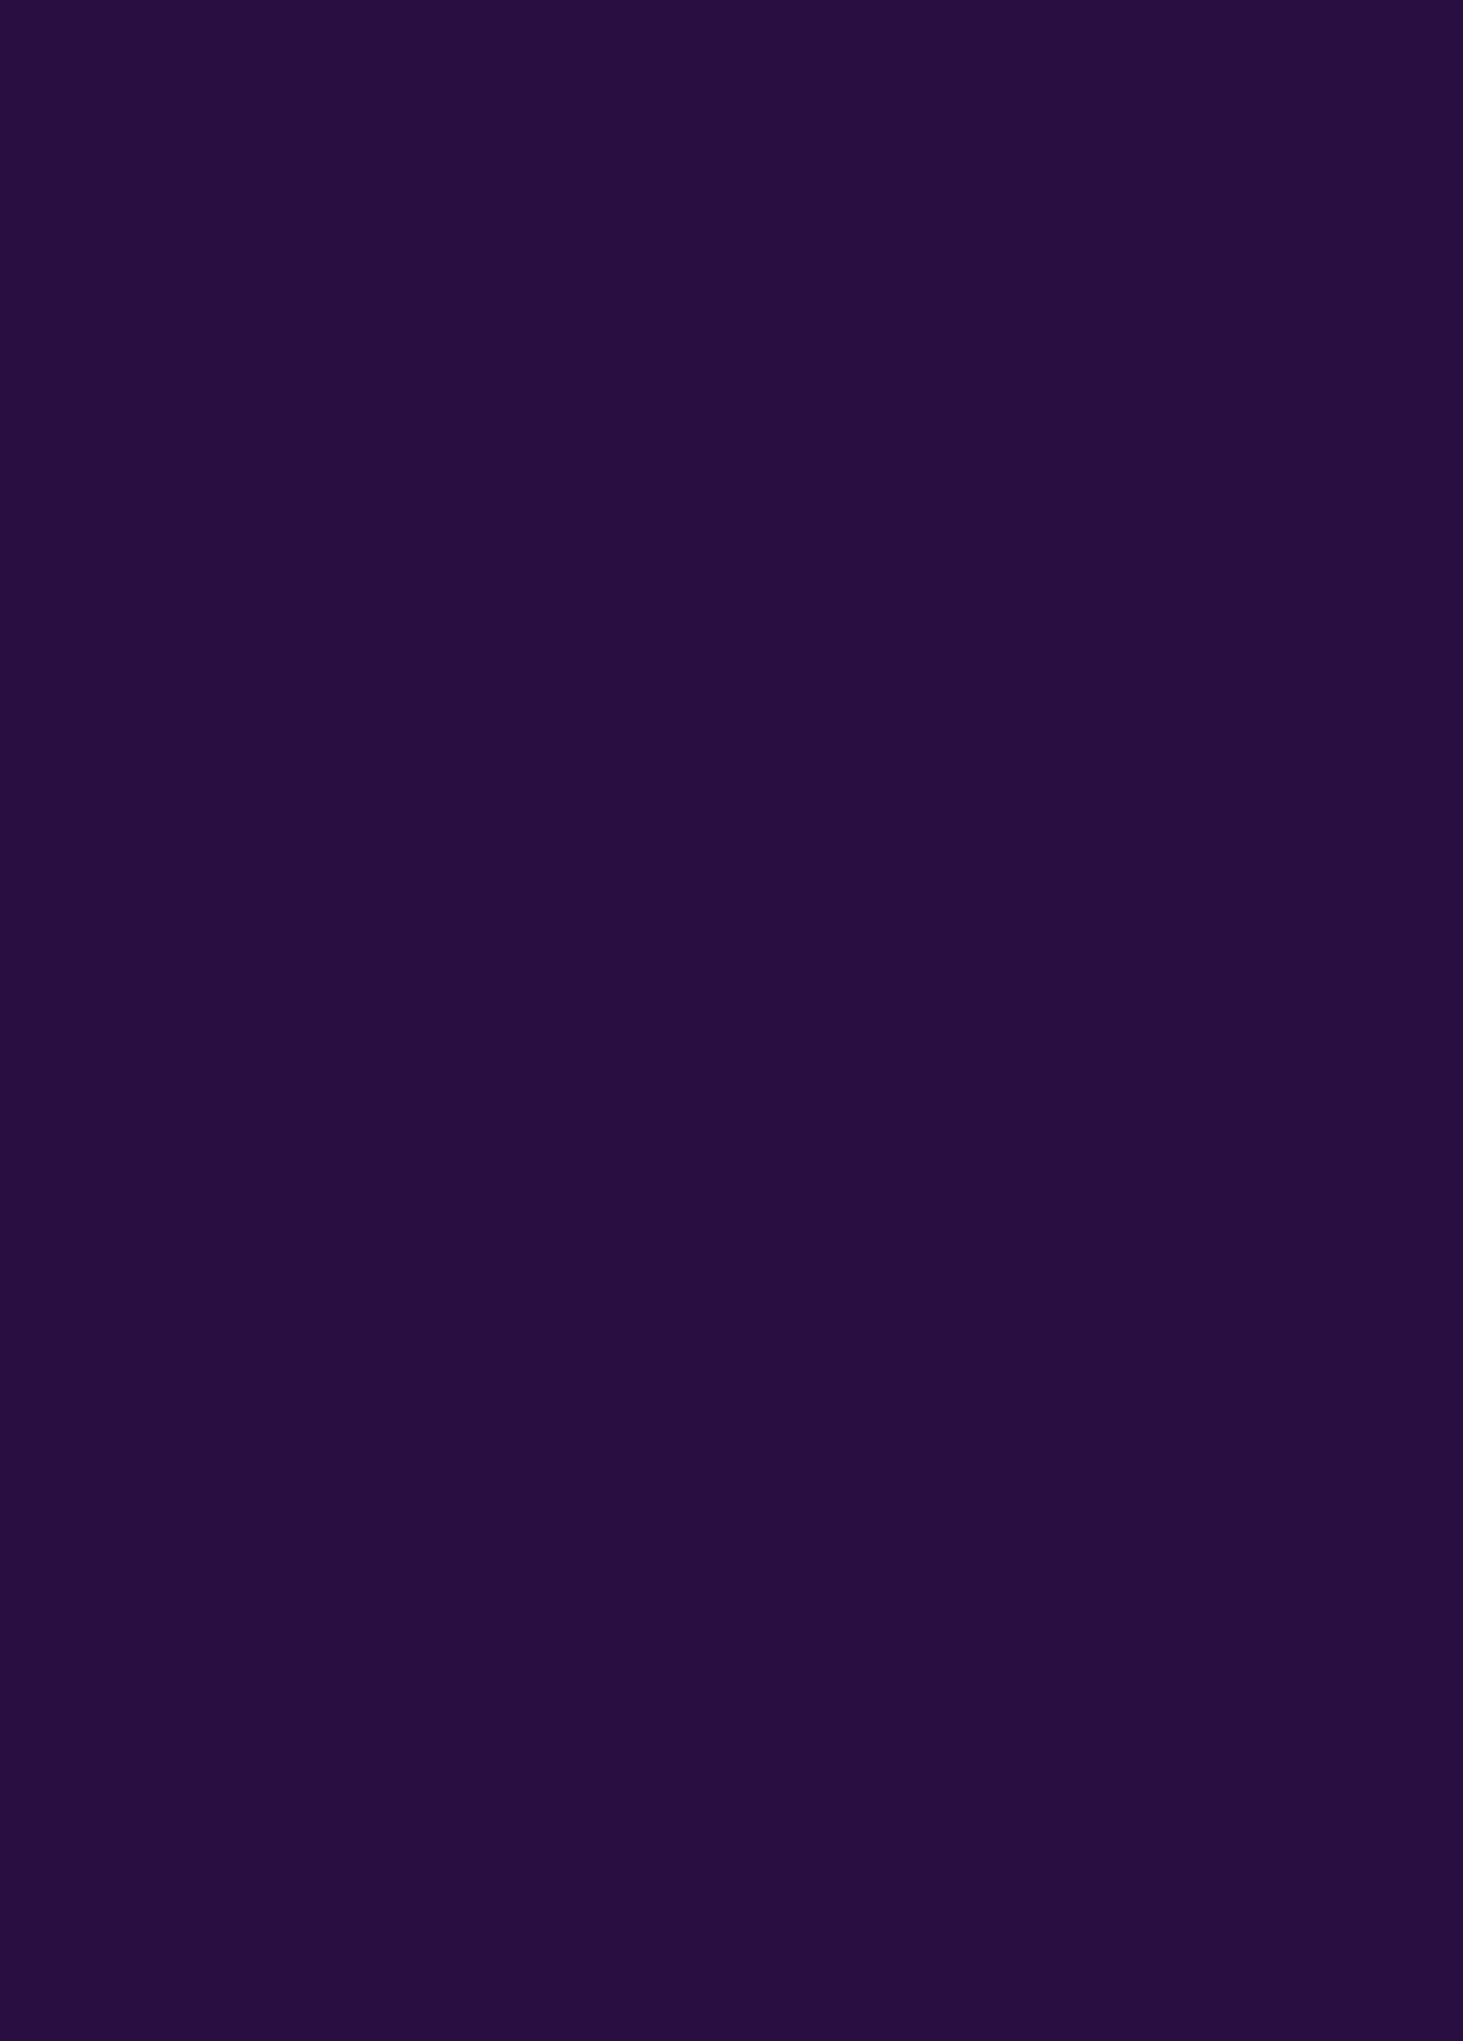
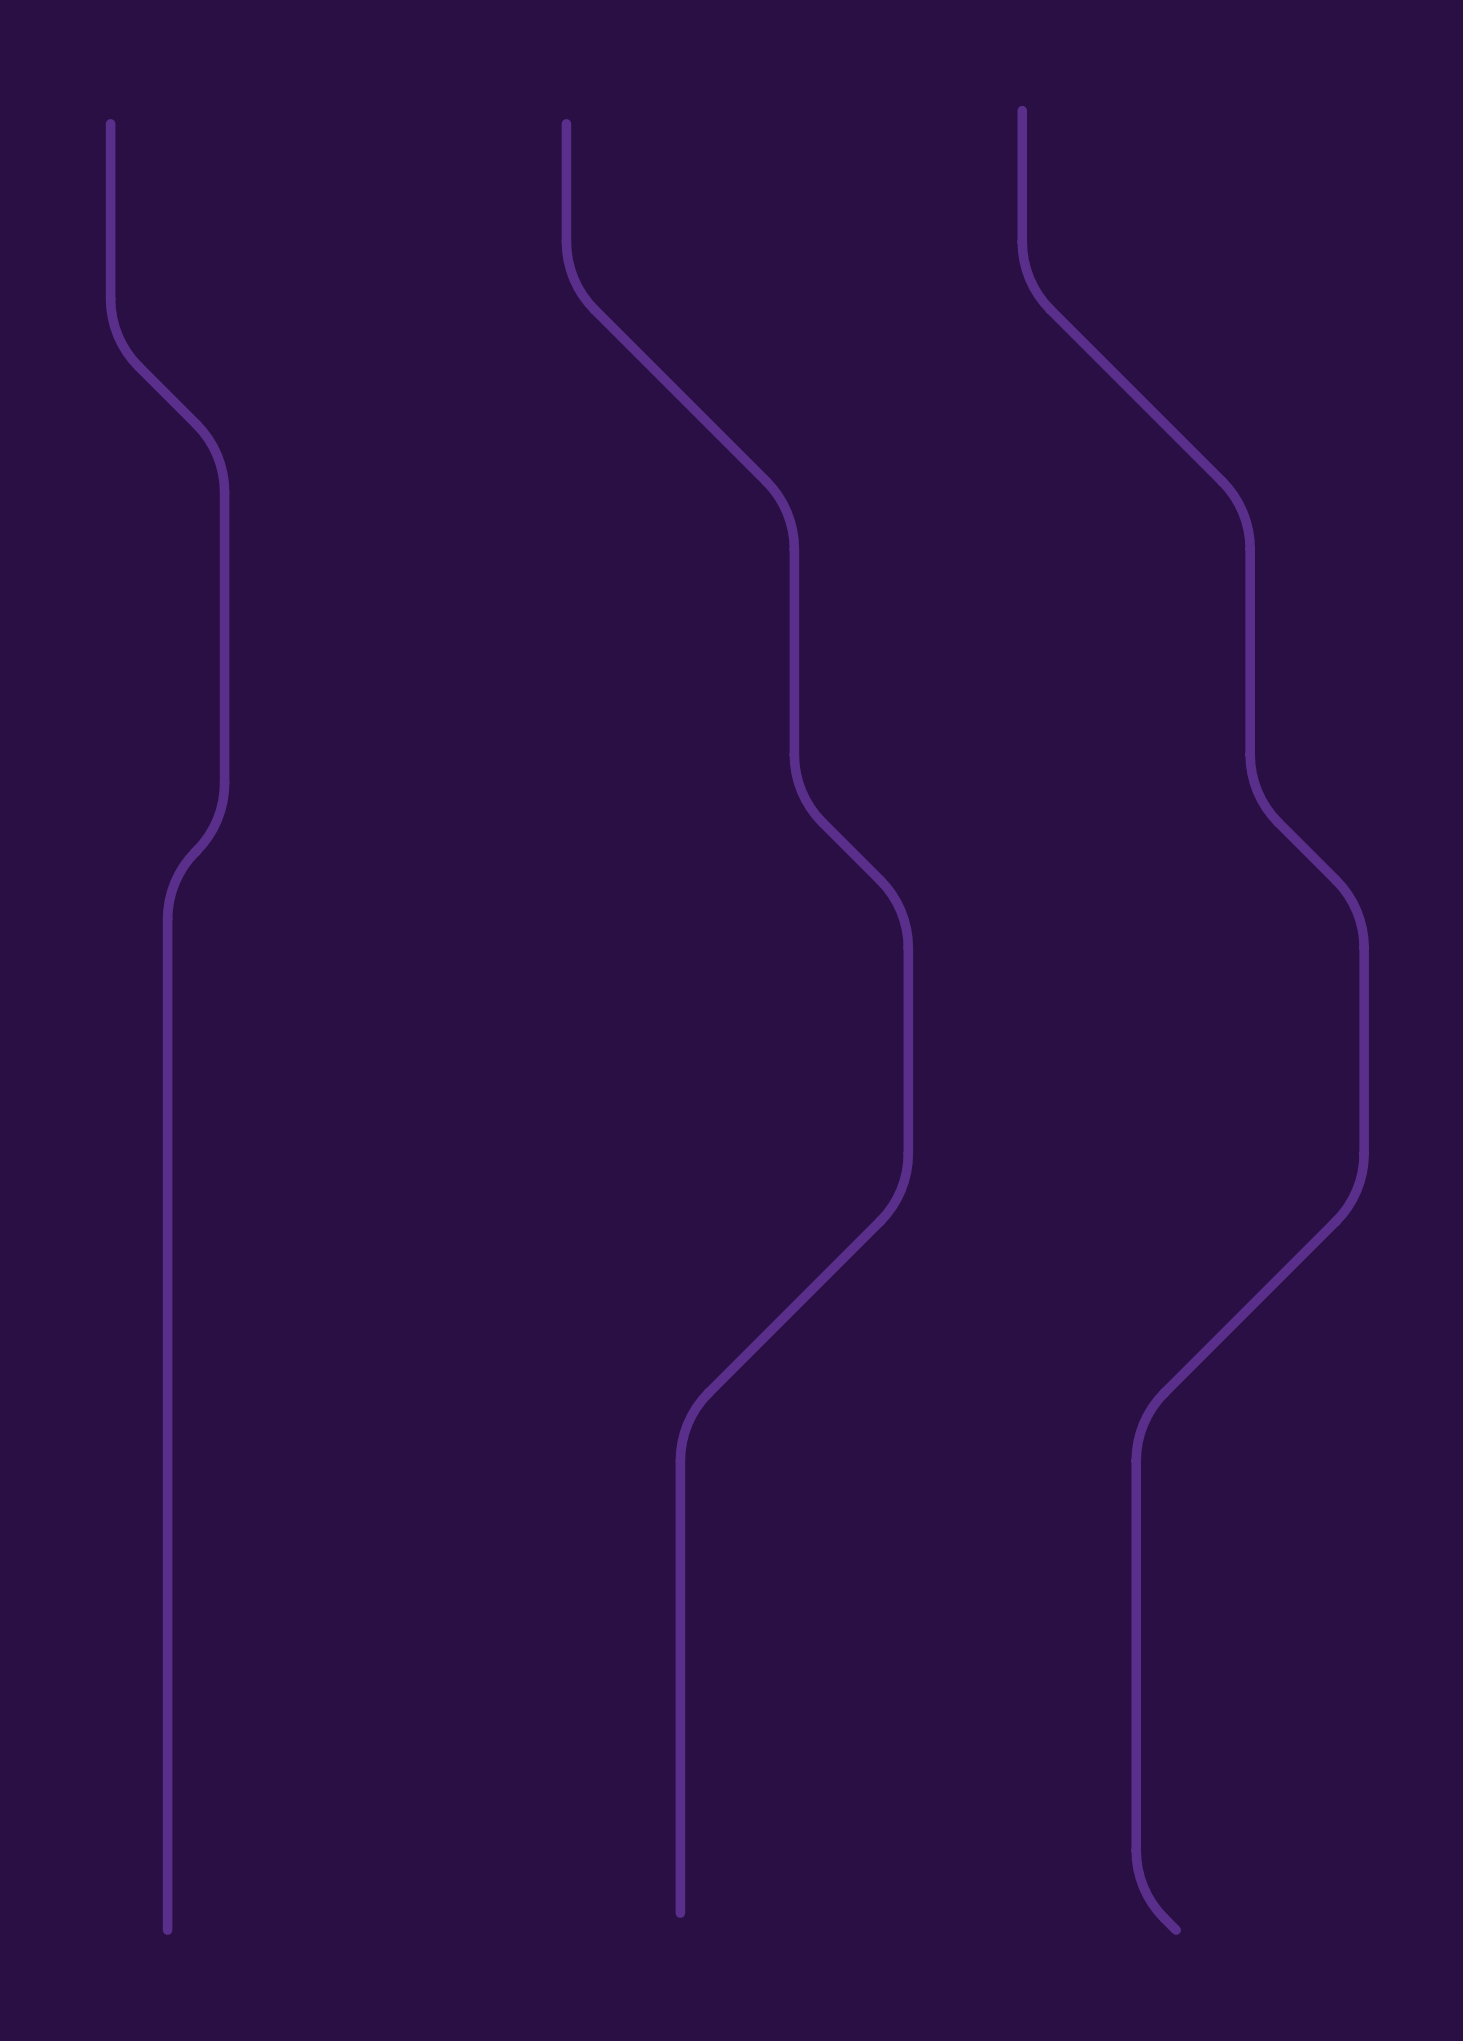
track: none -> (1022, 110) (1022, 241) (1024, 260) (1029, 278) (1038, 295) (1050, 309) (1222, 481) (1238, 503) (1246, 521) (1249, 539) (1250, 754) (1254, 782) (1261, 799) (1271, 815) (1348, 894) (1356, 911) (1363, 938) (1364, 1153) (1362, 1172) (1356, 1190) (1348, 1206) (1336, 1221) (1157, 1400) (1147, 1415) (1138, 1442) (1136, 1460) (1136, 1859) (1140, 1878) (1147, 1895) (1157, 1911) (1176, 1930)
track: none -> (110, 123) (110, 298) (114, 326) (121, 344) (132, 359) (208, 438) (220, 464) (224, 492) (224, 792) (220, 810) (213, 828) (183, 866) (174, 882) (169, 900) (167, 919) (167, 1930)
track: none -> (566, 123) (566, 251) (570, 269) (577, 287) (594, 309) (766, 481) (778, 495) (787, 512) (792, 530) (794, 549) (794, 754) (798, 782) (805, 799) (816, 815) (892, 894) (904, 920) (907, 938) (908, 1153) (906, 1172) (901, 1190) (892, 1206) (880, 1221) (702, 1400) (691, 1415) (682, 1442) (680, 1460) (680, 1913)

